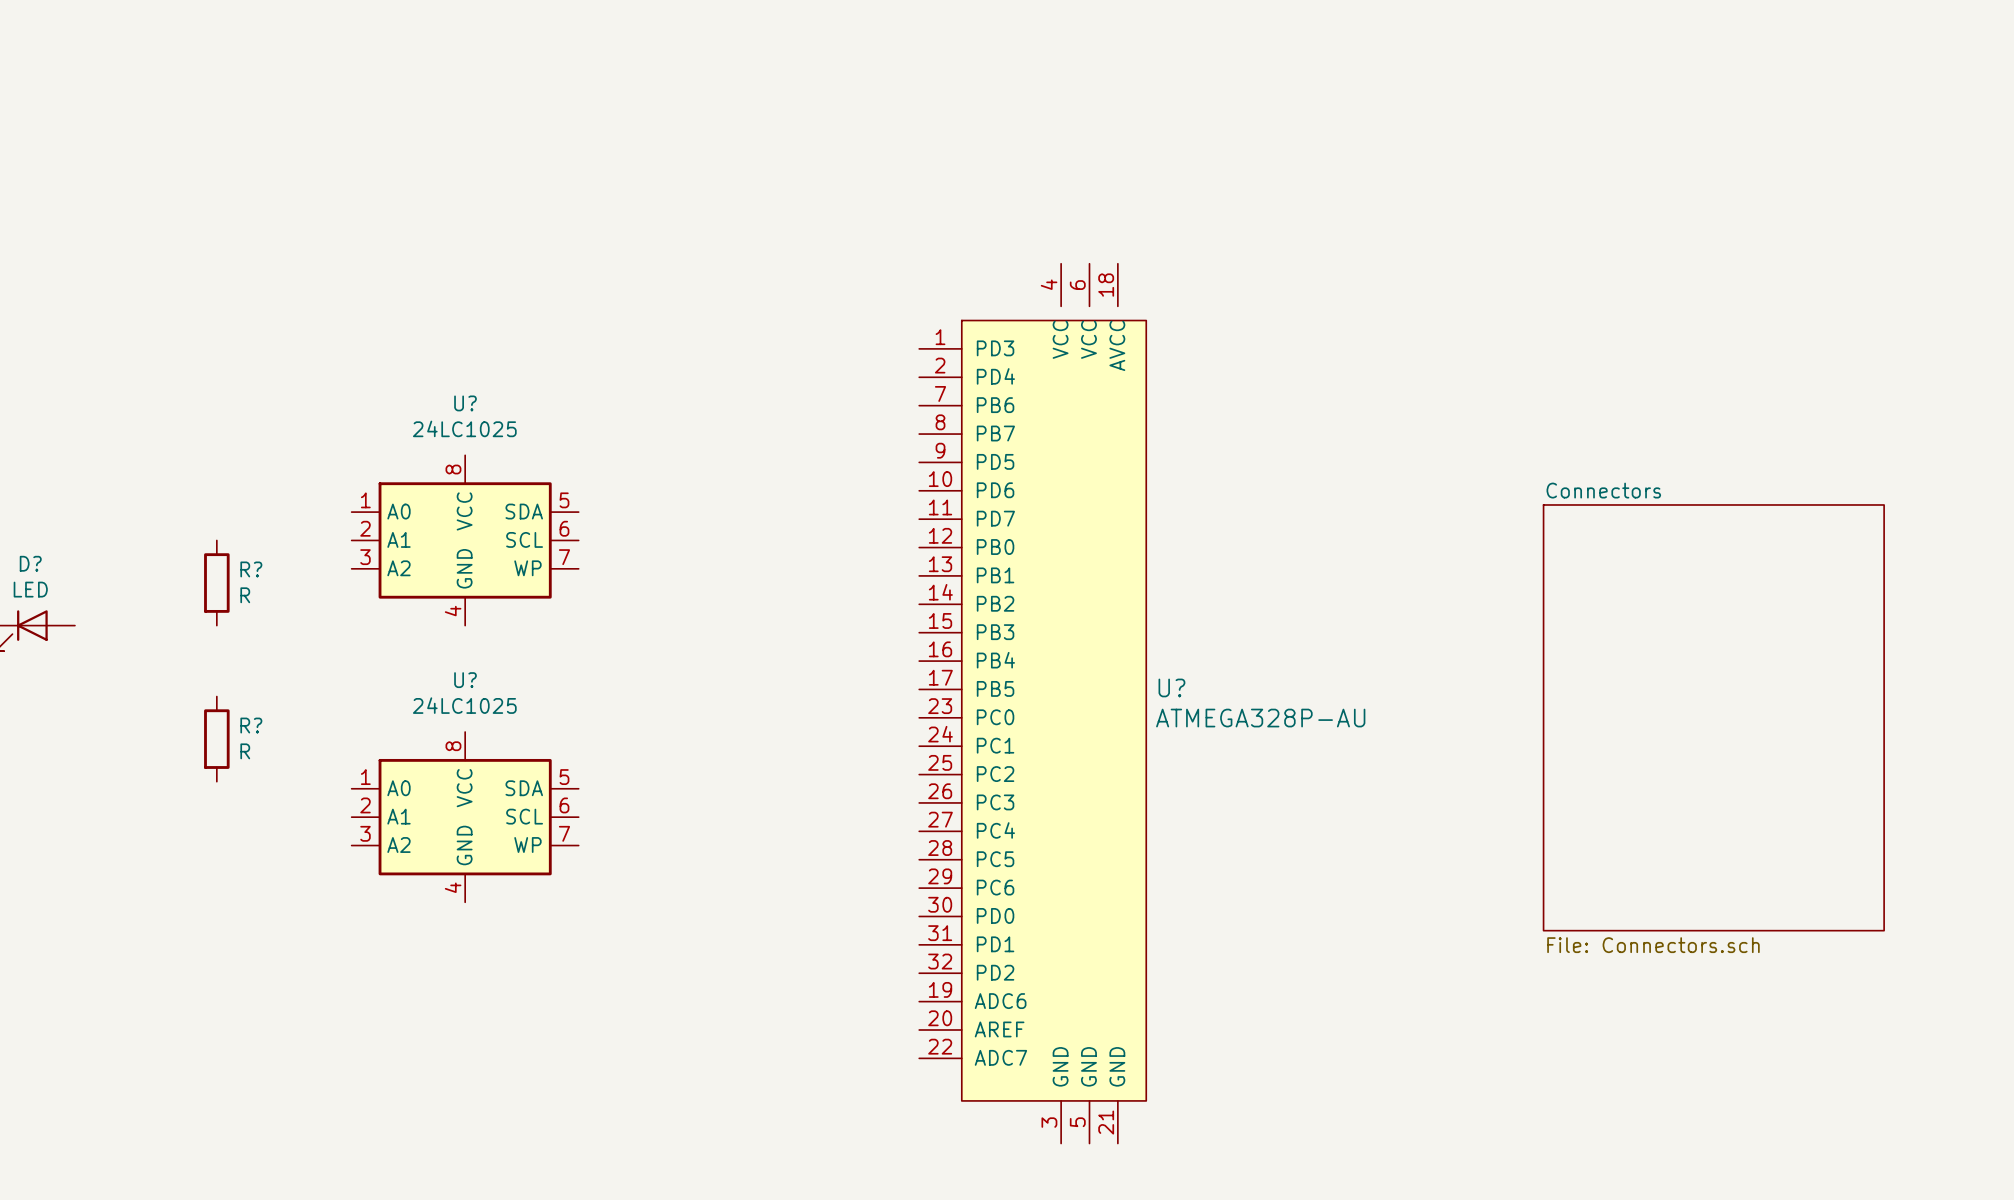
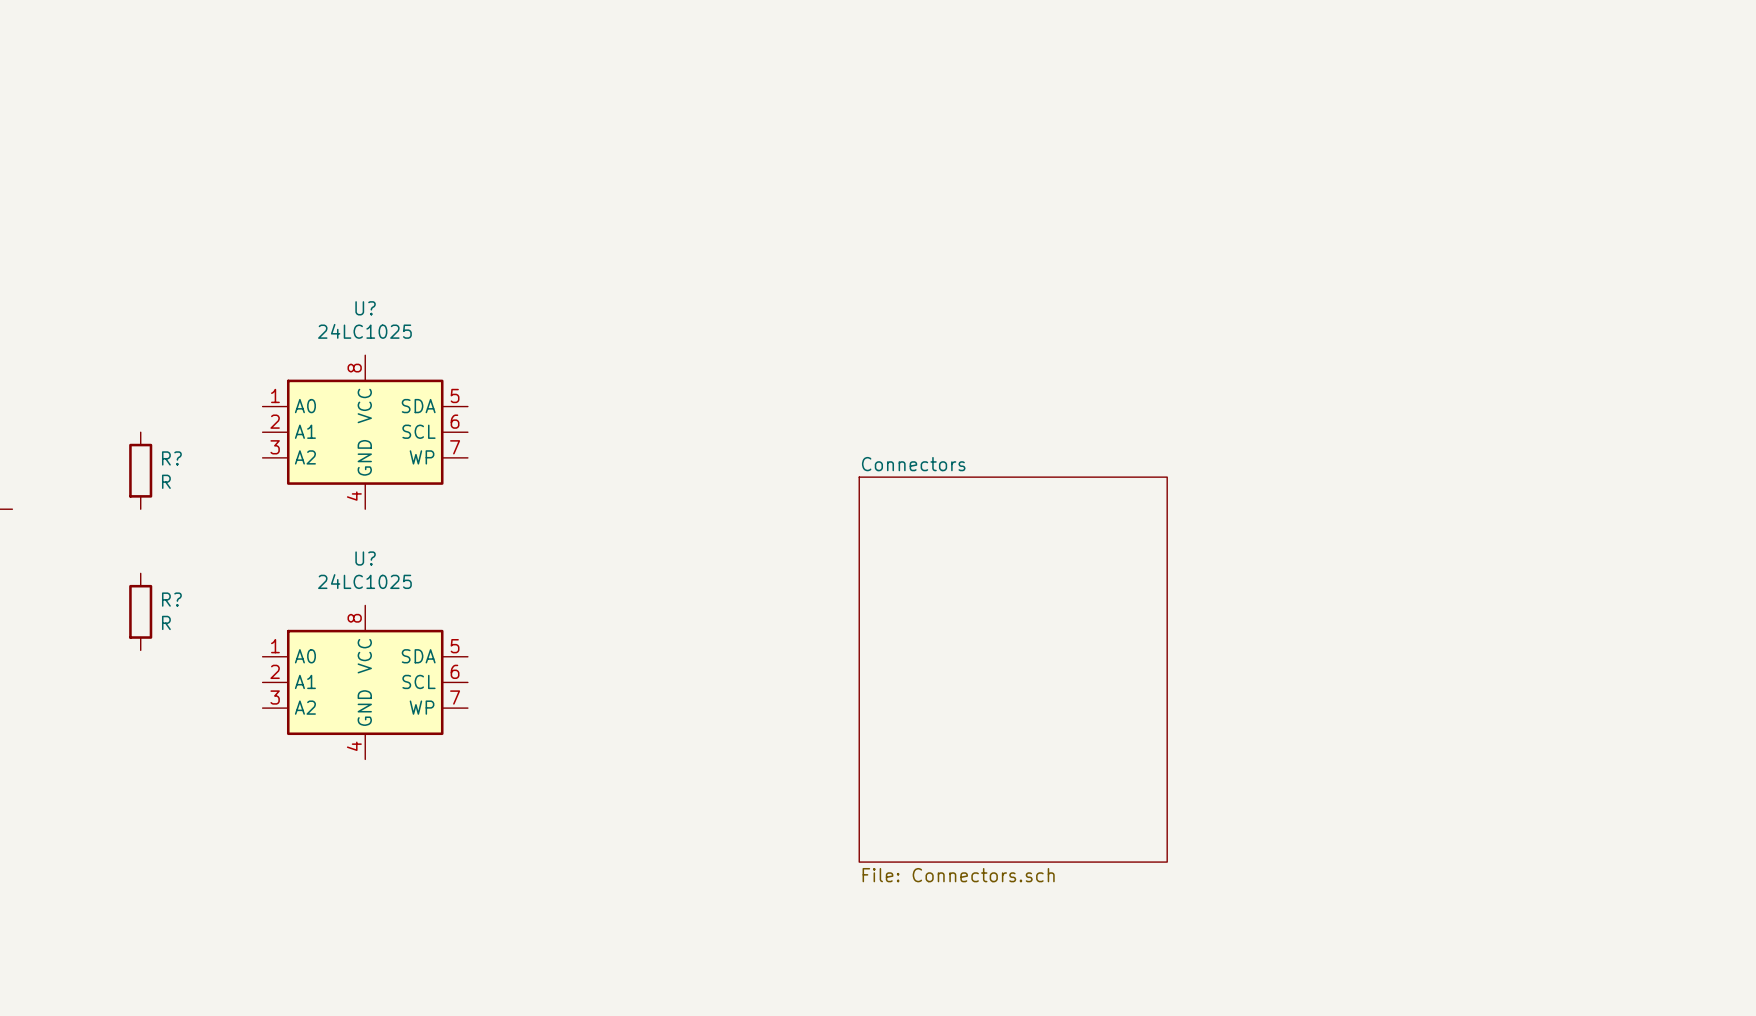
U?: ATMEGA328P-AU (1032, 703) -> none
sheet Connectors: File: Connectors.sch (1713, 717) -> none
sheet Connectors: none -> File: Connectors.sch (1013, 669)

